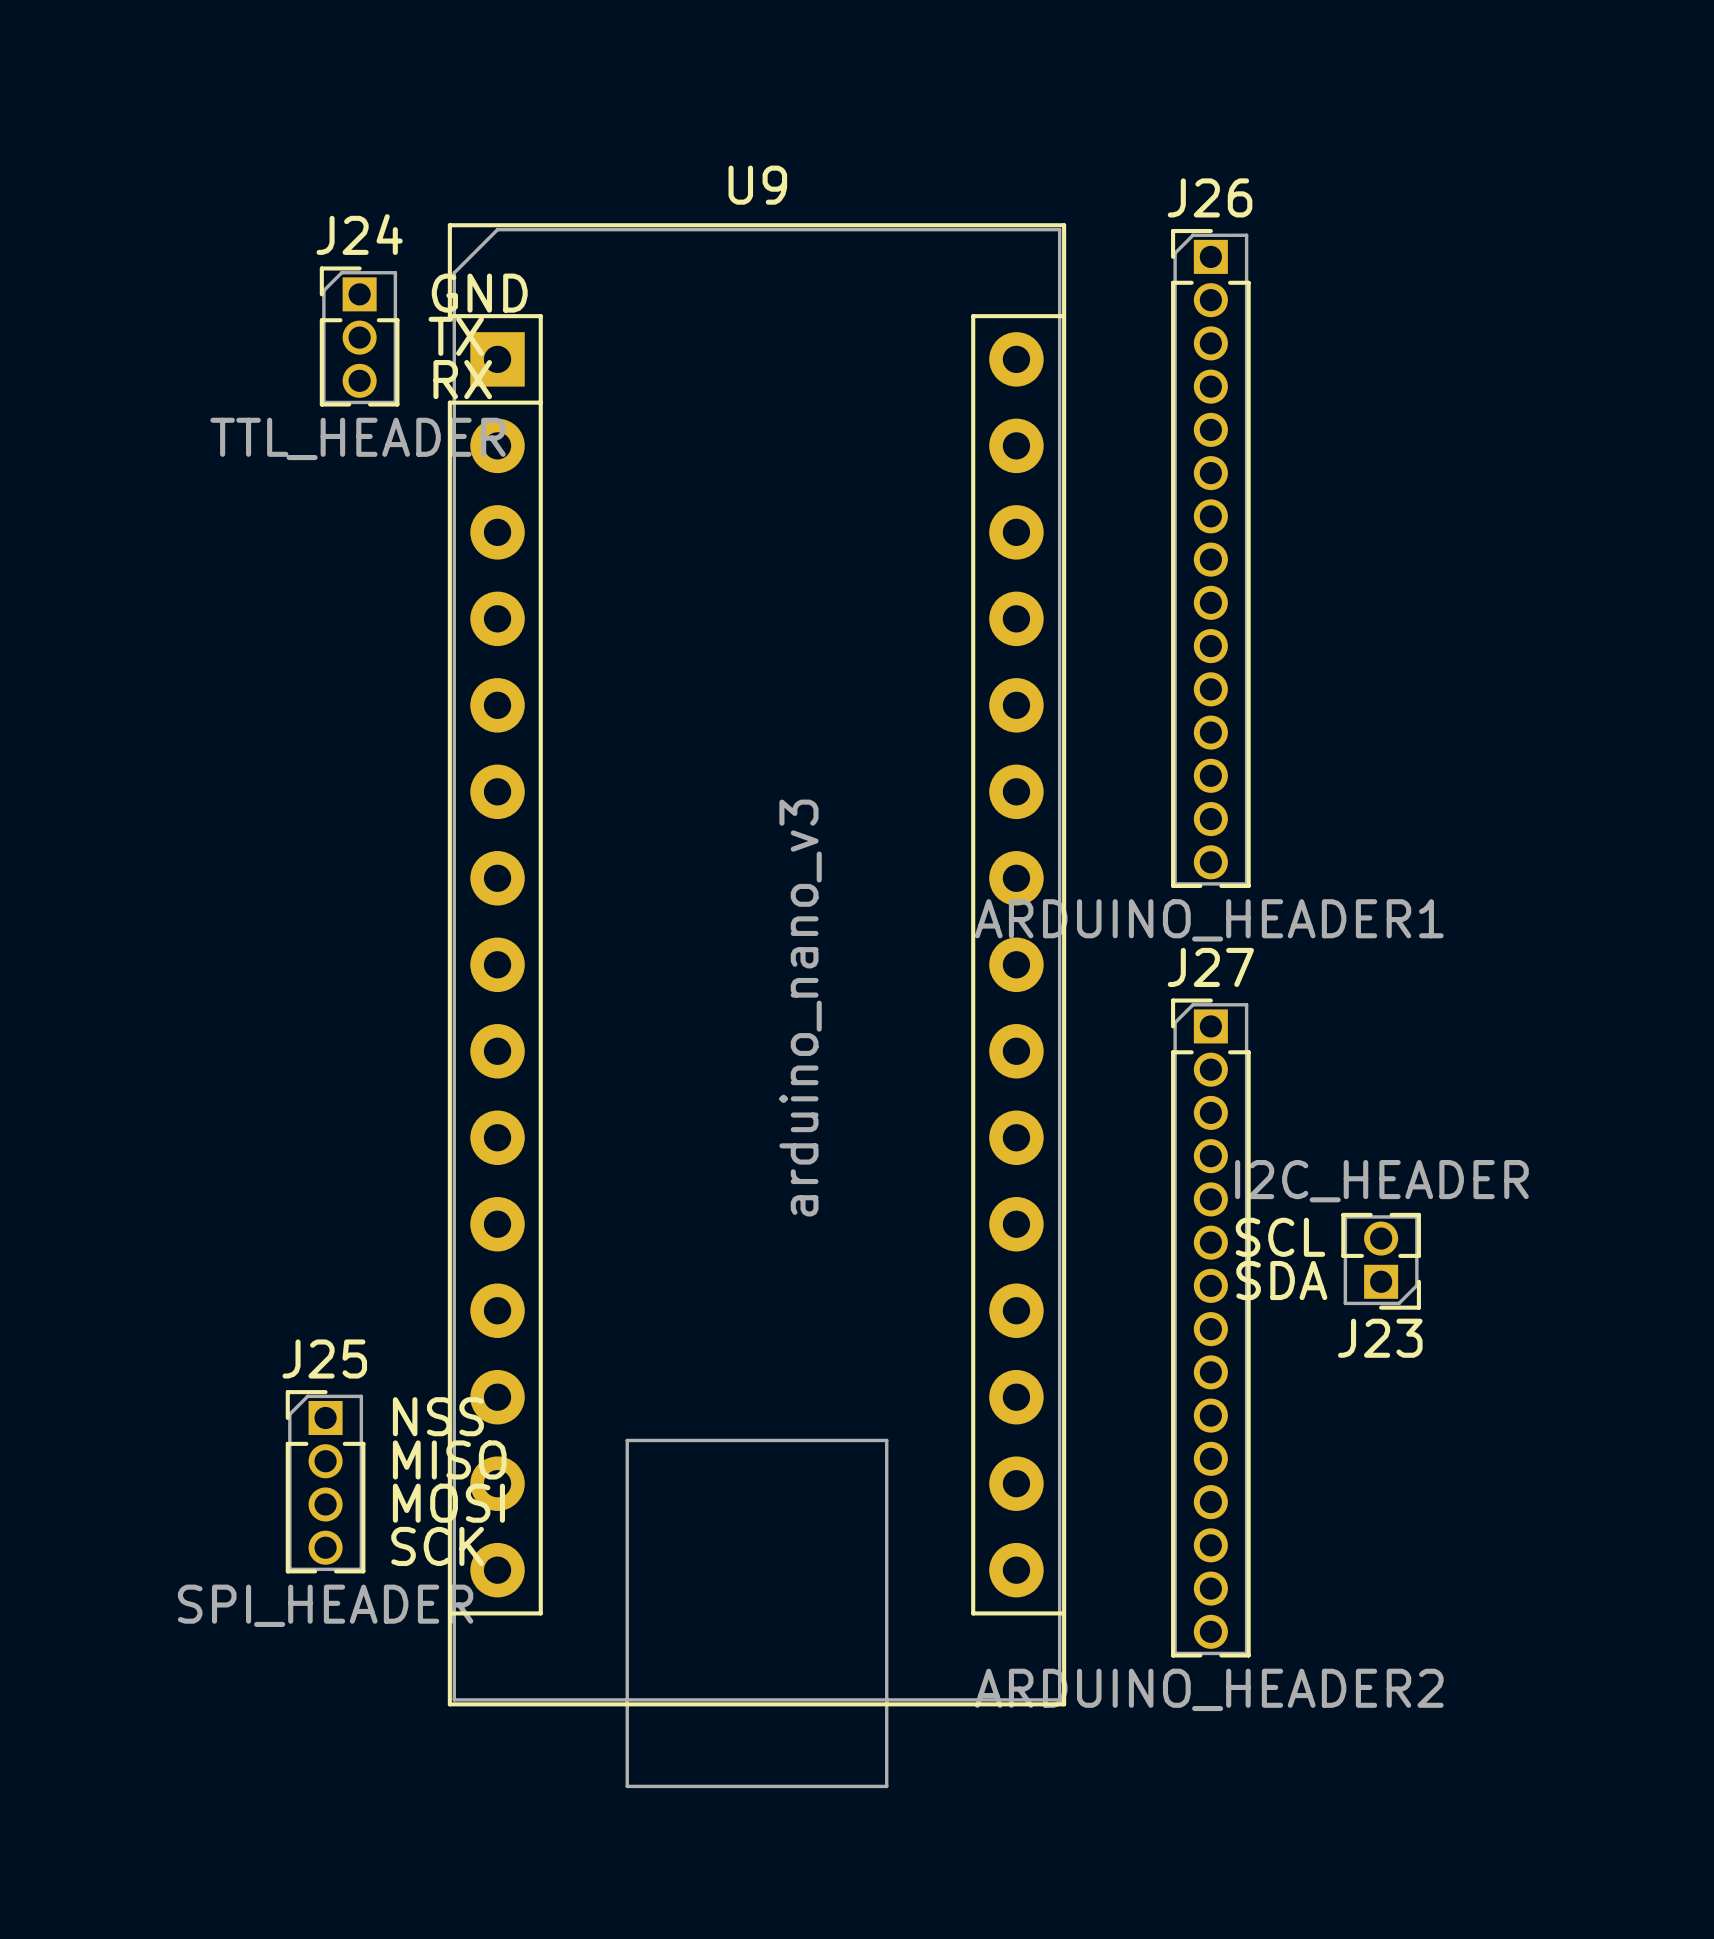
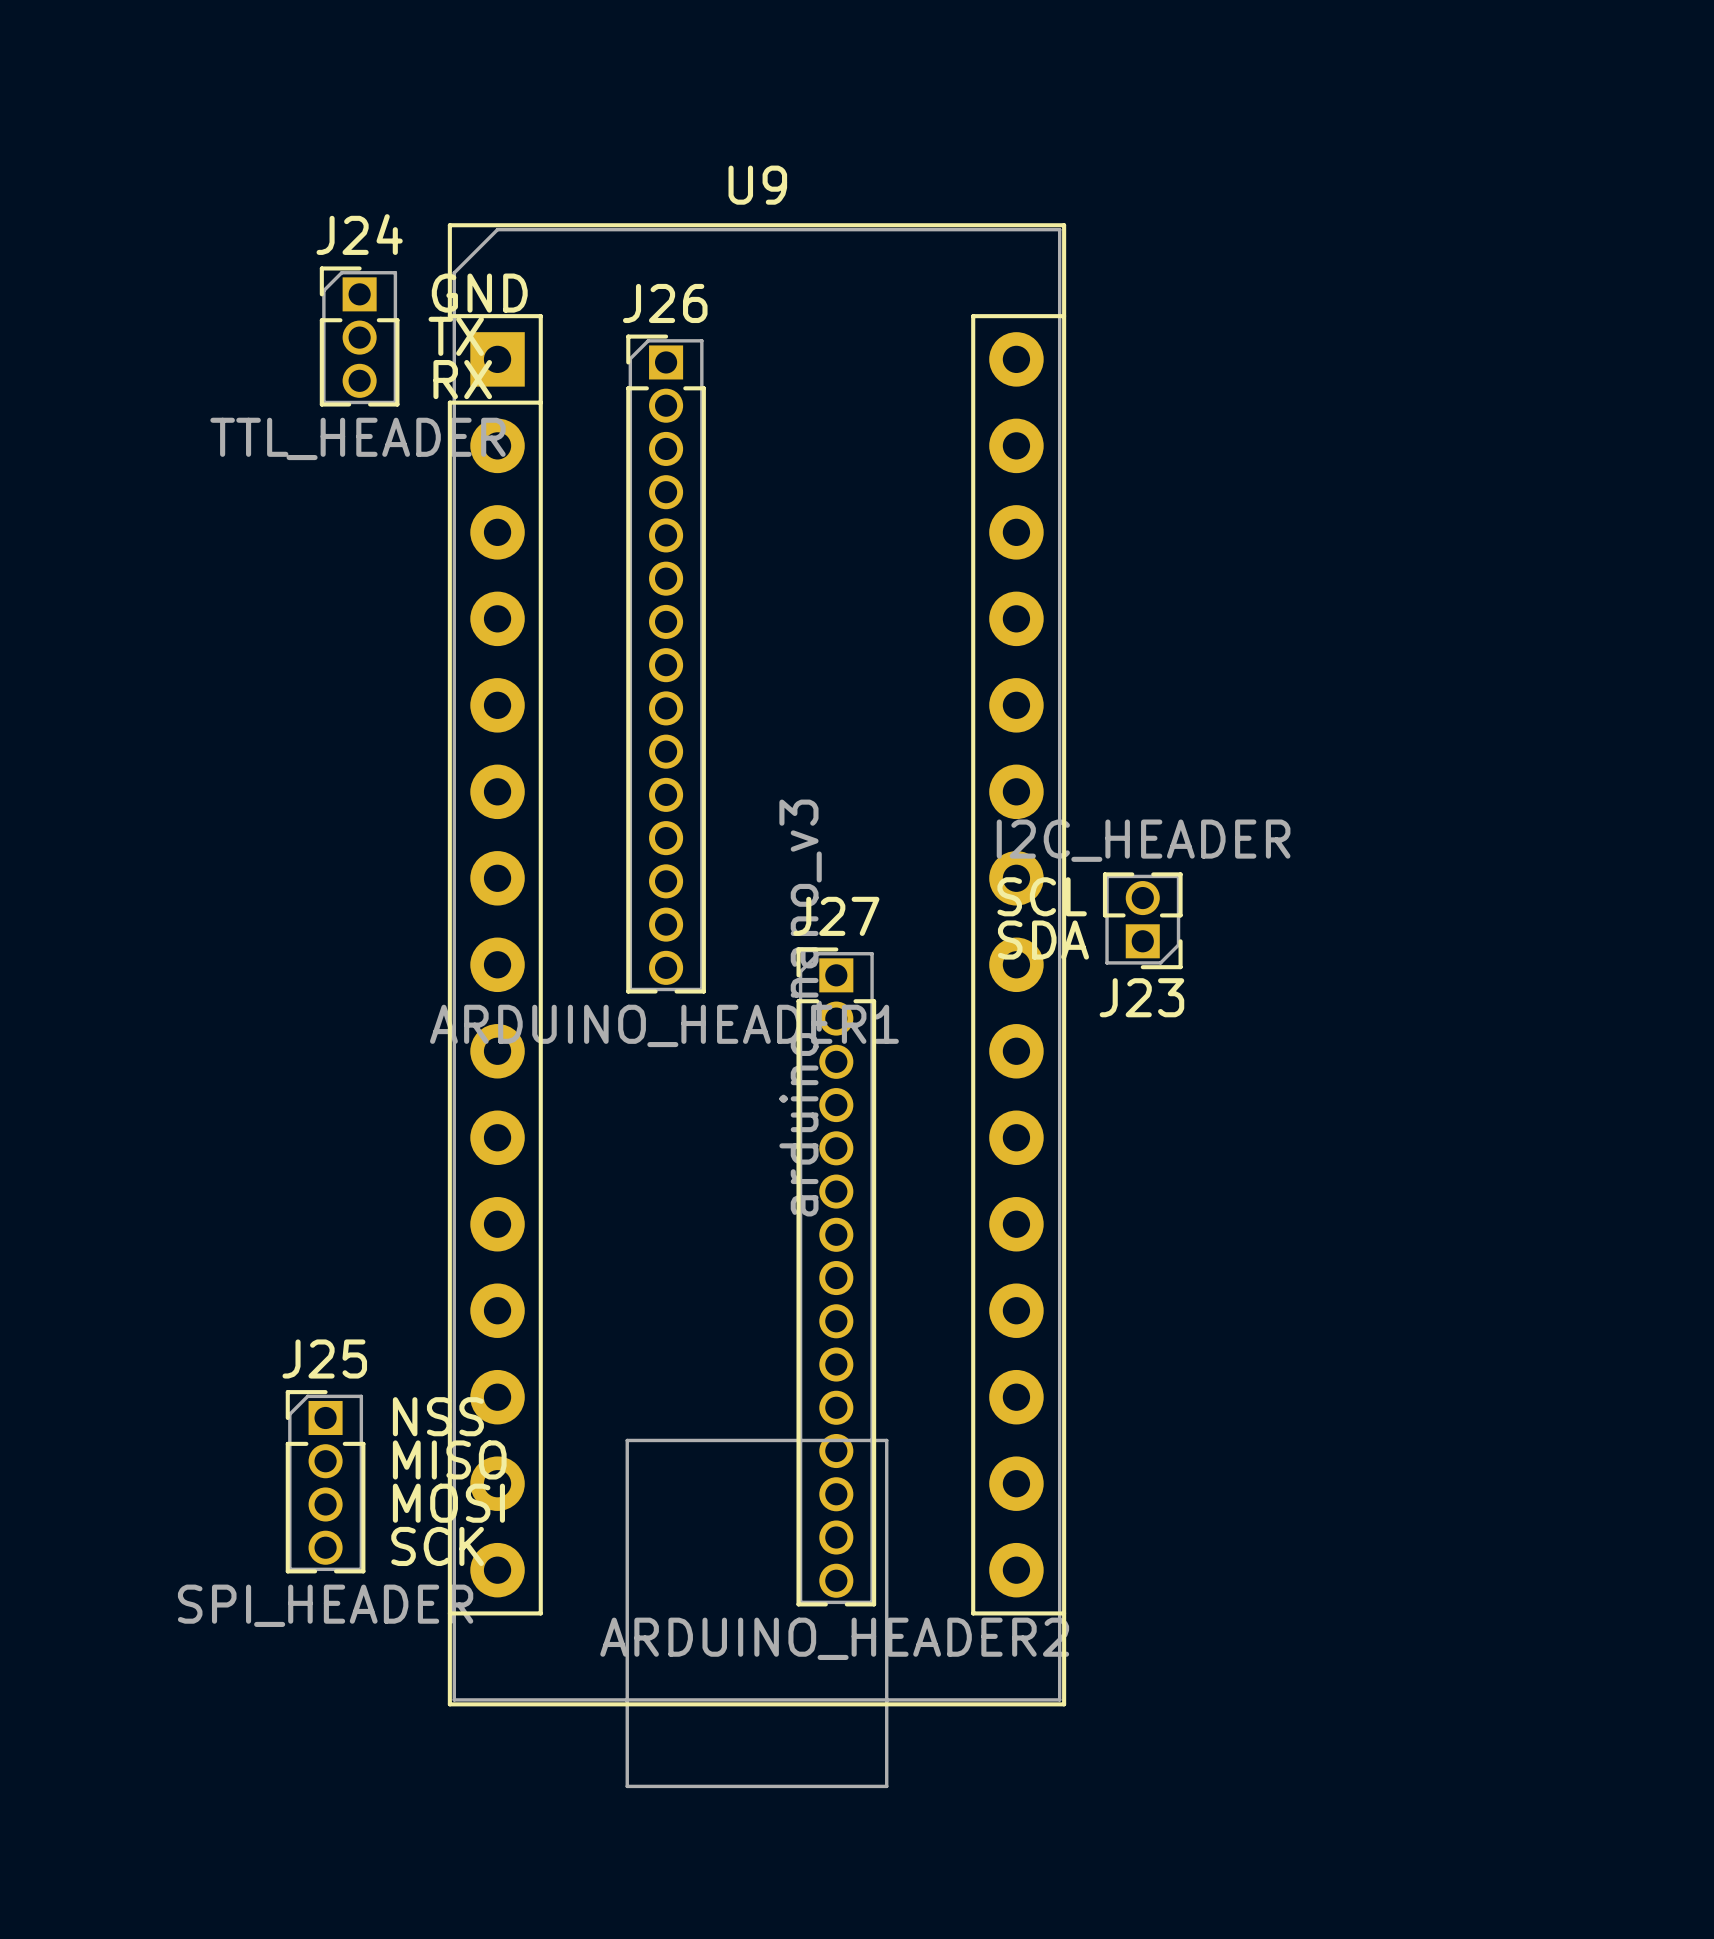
J26 position: (1210, 558) -> (666, 664)
J23 position: (1381, 1261) -> (1142, 920)
J27 position: (1210, 1328) -> (836, 1276)

